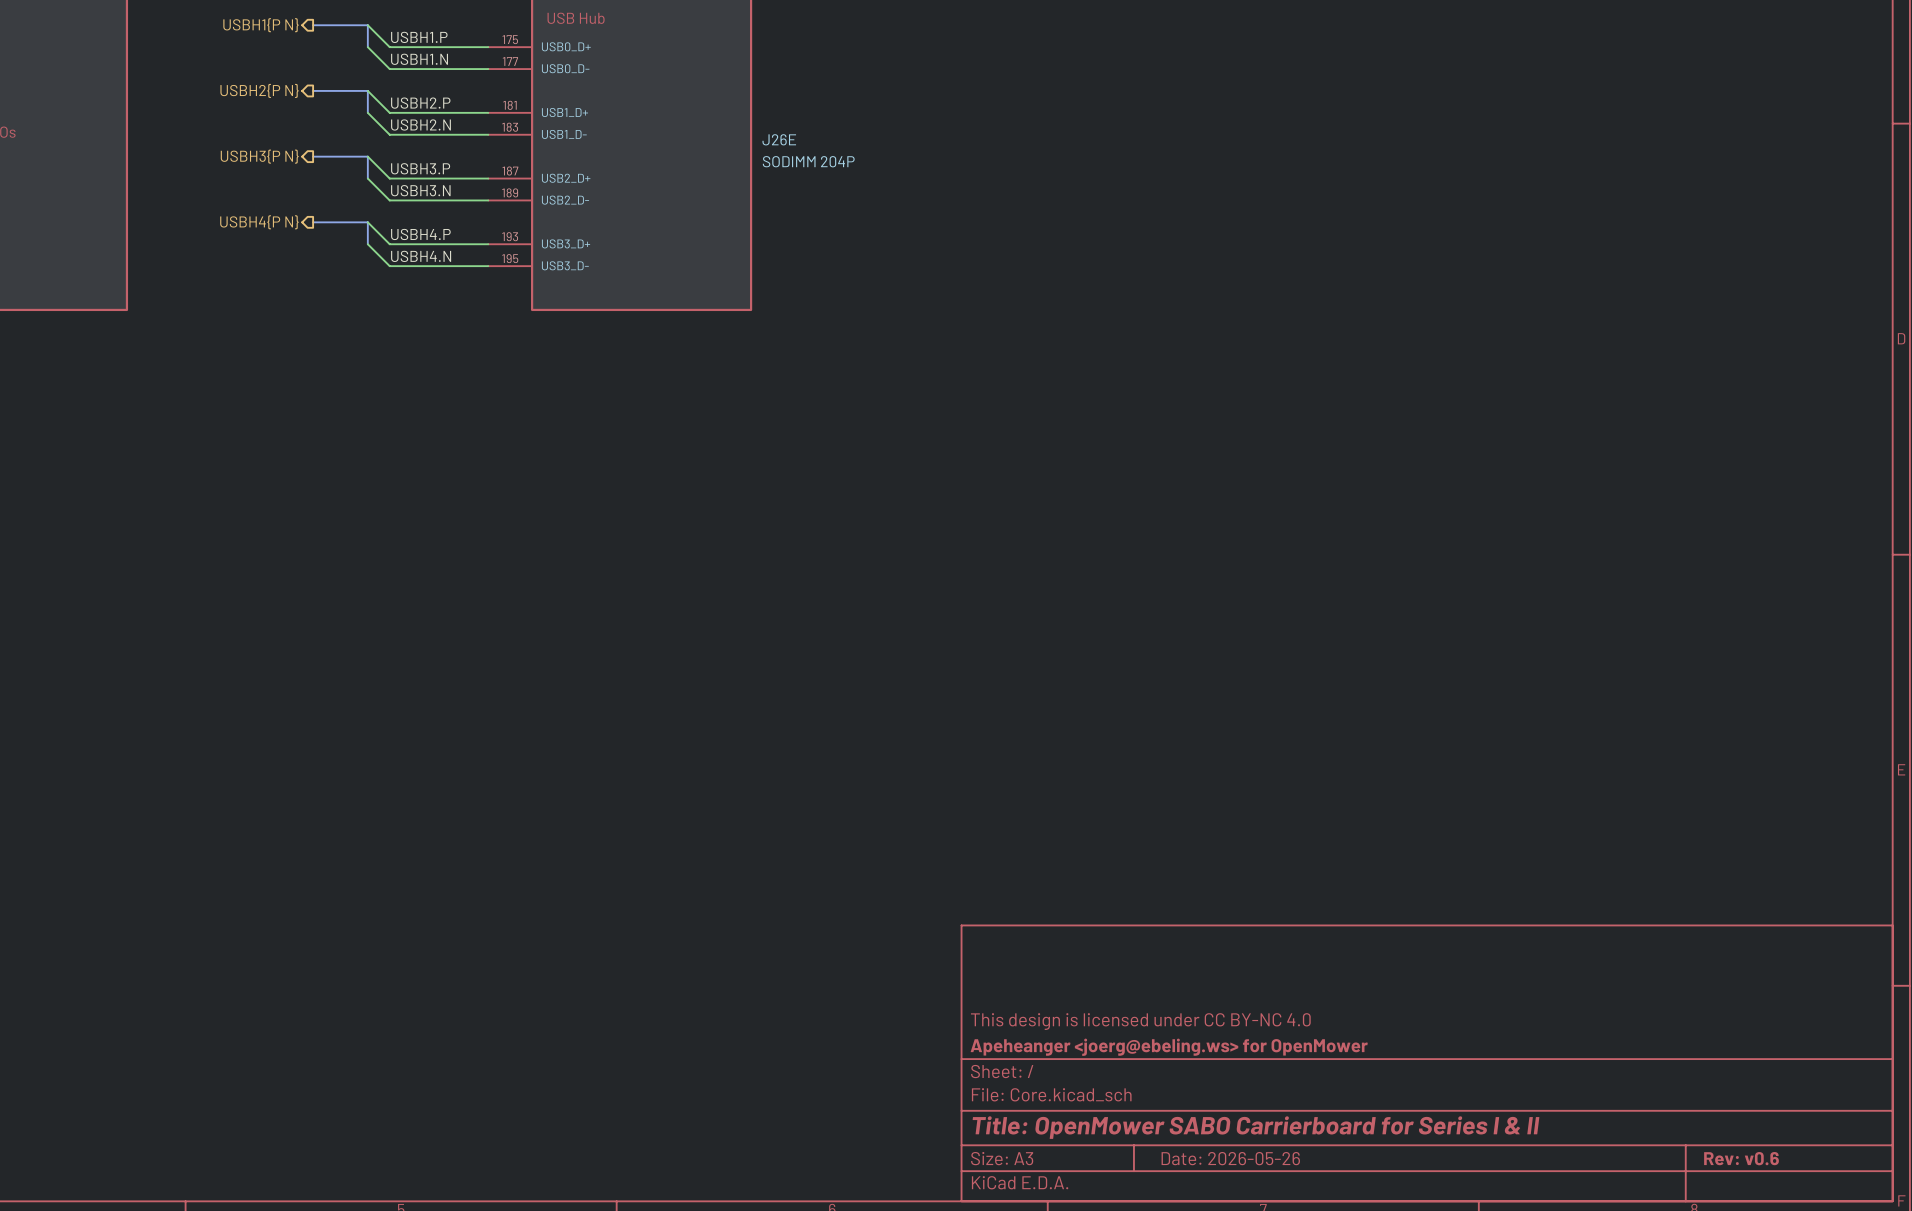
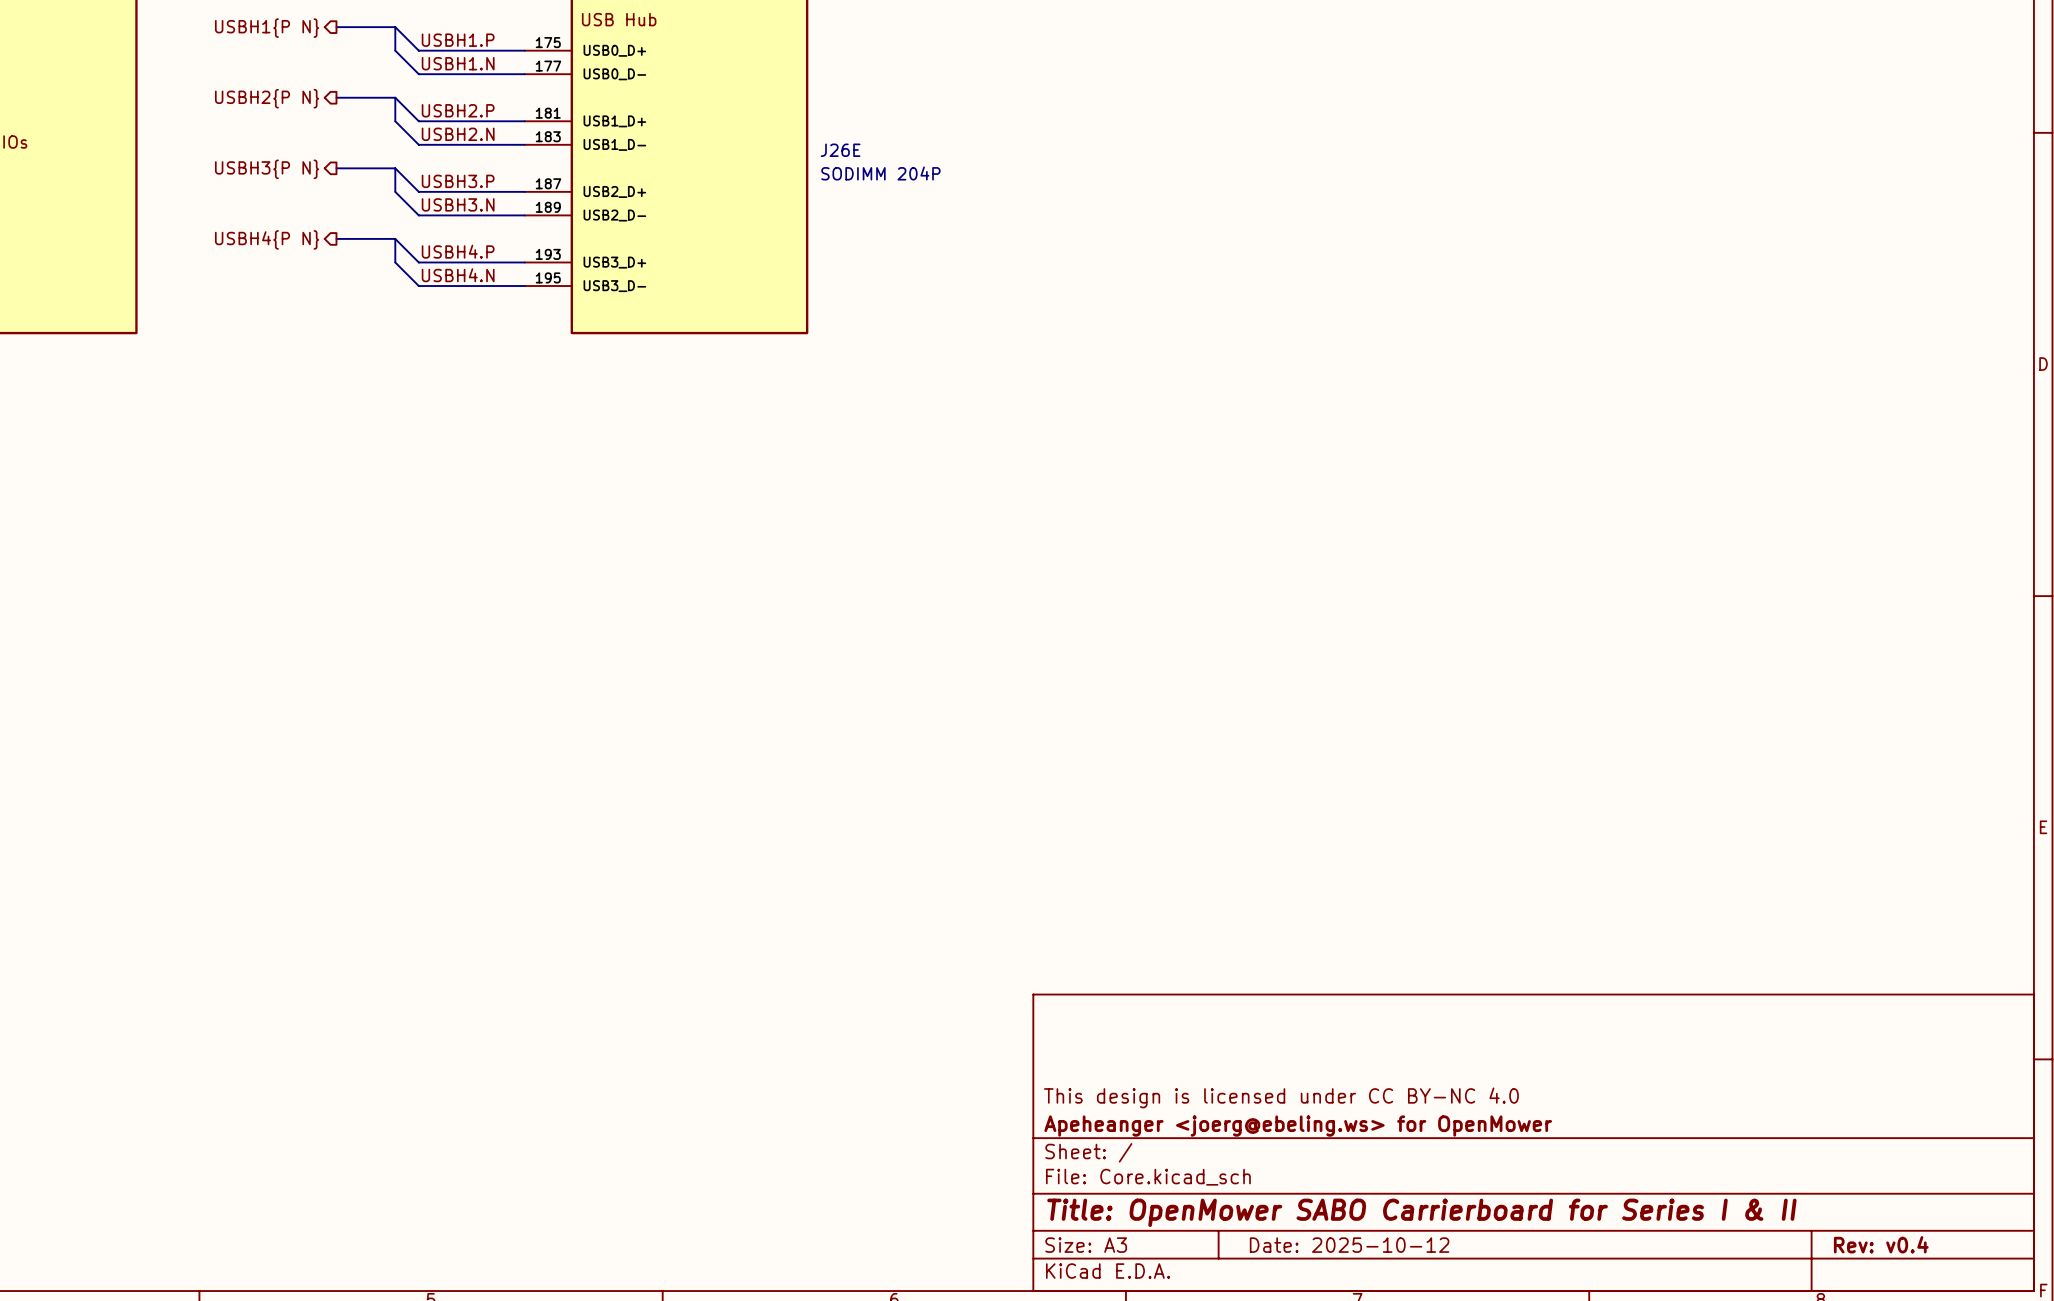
title block: Date: 2026-05-26 (1230, 1158) -> Date: 2025-10-12 (1349, 1245)
title block: Rev: v0.6 (1741, 1158) -> Rev: v0.4 (1881, 1244)

